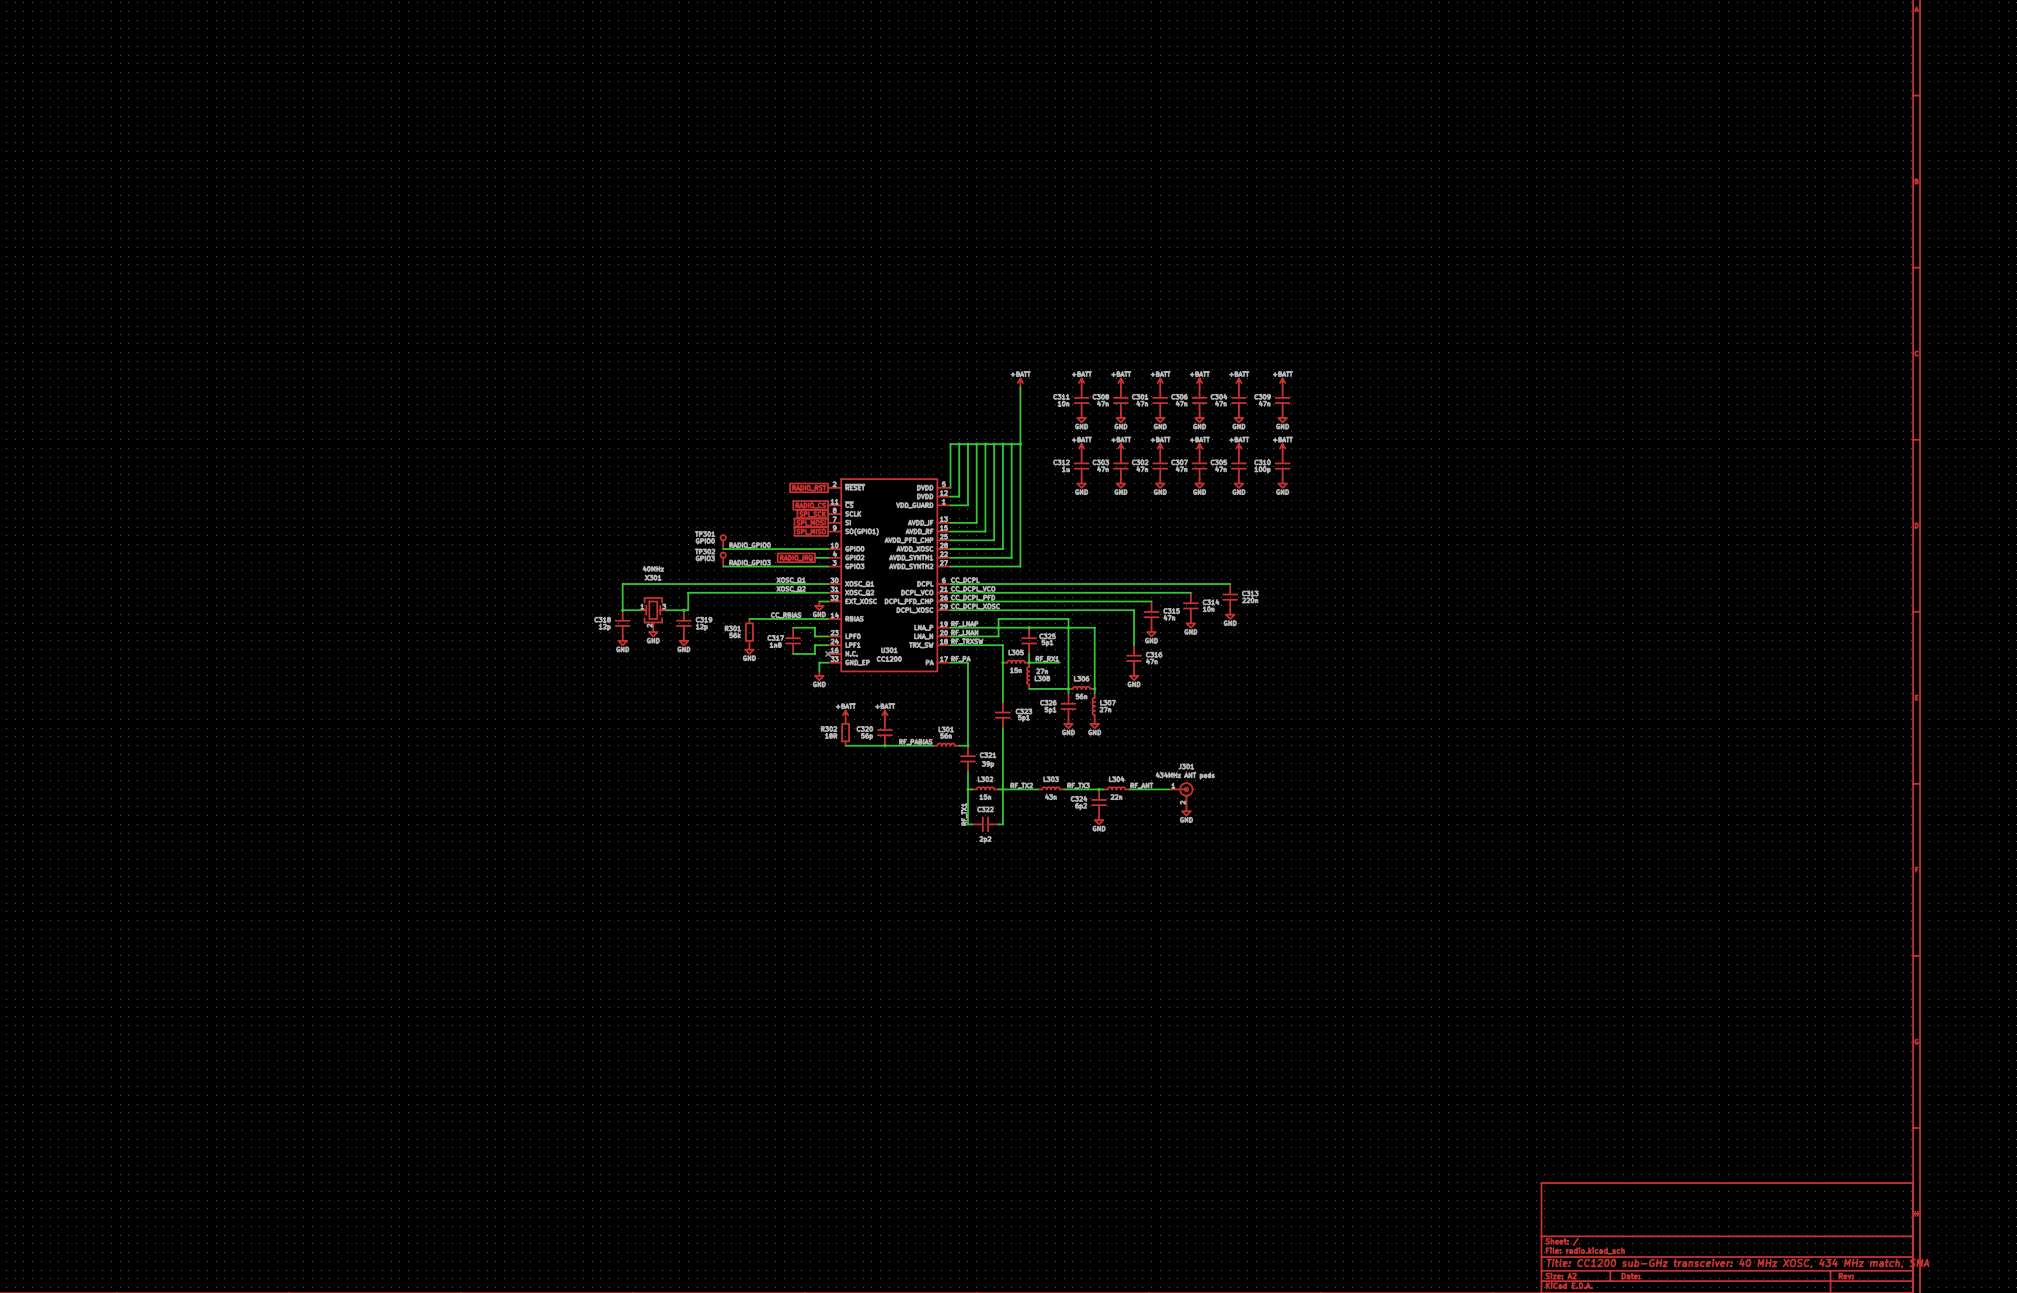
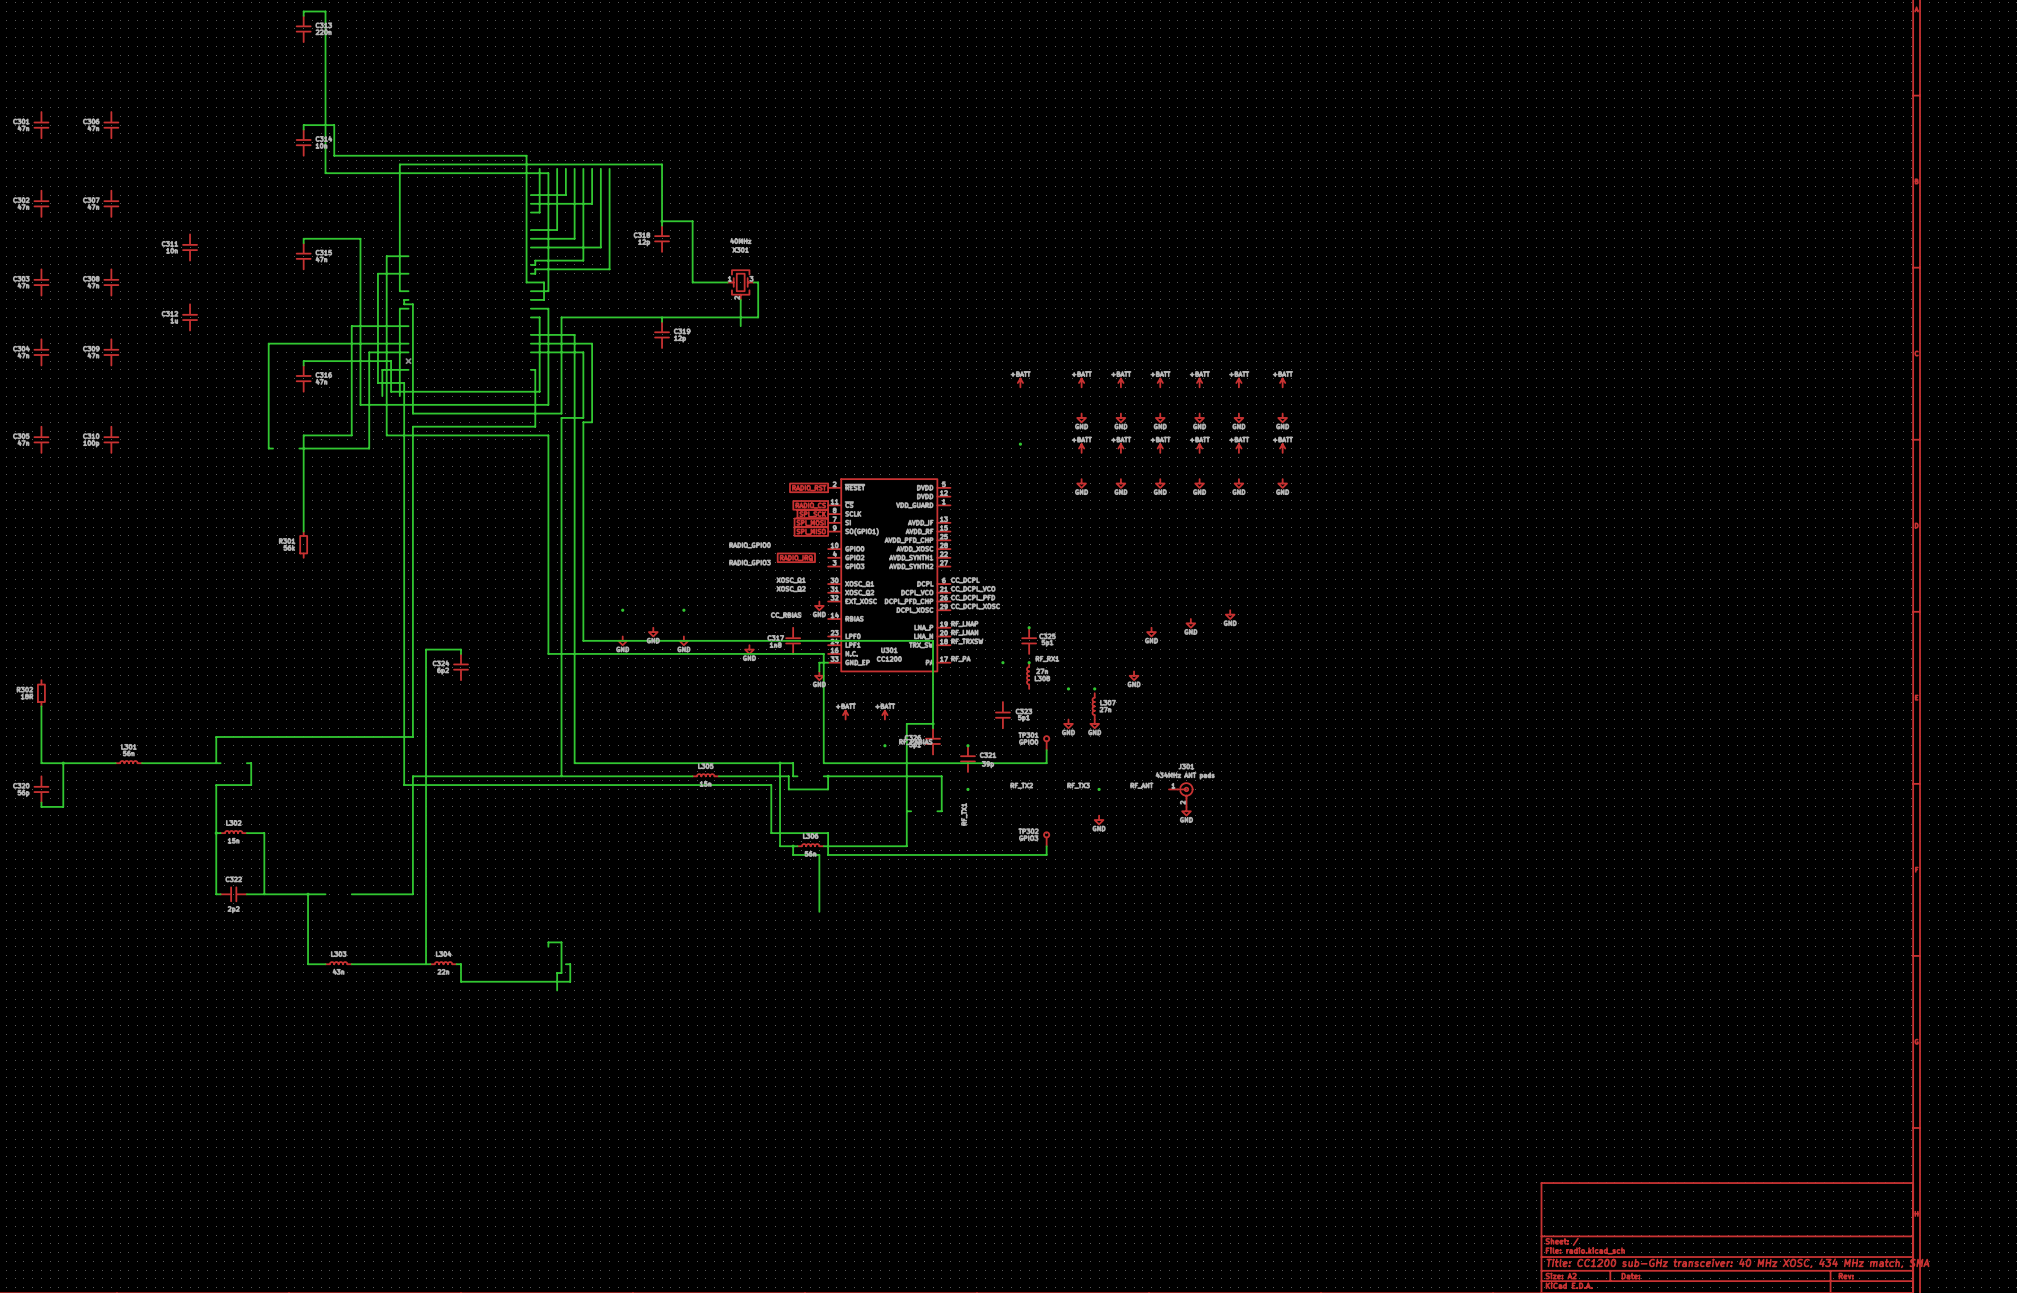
wire: none -> (303, 15) (303, 11) (325, 11) (325, 173) (548, 173) (548, 291) (530, 291)
wire: none -> (303, 129) (303, 125) (334, 125) (334, 155) (526, 155) (526, 282) (544, 282) (544, 299) (530, 299)
wire: none -> (539, 168) (539, 212) (530, 212)
wire: none -> (557, 168) (557, 230) (530, 230)
wire: none -> (565, 168) (565, 195) (530, 195)
wire: none -> (574, 168) (574, 238) (530, 238)
wire: none -> (583, 168) (583, 260) (535, 260) (535, 264) (530, 264)
wire: none -> (592, 168) (592, 203) (530, 203)
wire: none -> (600, 168) (600, 247) (530, 247)
wire: none -> (609, 168) (609, 269) (535, 269) (535, 273) (530, 273)
wire: none -> (662, 221) (692, 221) (692, 282) (727, 282)
wire: none -> (662, 225) (662, 164) (399, 164) (399, 291) (408, 291)
wire: none -> (303, 243) (303, 238) (360, 238) (360, 404) (548, 404) (548, 308) (530, 308)
wire: none -> (408, 256) (386, 256) (386, 435) (548, 435) (548, 653) (793, 653)
wire: none -> (408, 273) (377, 273) (377, 382) (404, 382) (404, 785) (771, 785) (771, 833) (828, 833) (828, 854) (1046, 854) (1046, 846)
wire: none -> (753, 282) (758, 282) (758, 317) (561, 317) (561, 413) (412, 413) (412, 304) (404, 304) (404, 299) (408, 299)
wire: none -> (740, 299) (740, 326)
wire: none -> (408, 308) (399, 308) (399, 396)
wire: none -> (530, 317) (539, 317) (539, 391) (391, 391) (391, 361) (303, 361) (303, 365)
wire: none -> (662, 317) (662, 321)
wire: none -> (408, 326) (351, 326) (351, 435) (303, 435) (303, 531)
wire: none -> (530, 334) (574, 334) (574, 763) (793, 763) (793, 776) (797, 776)
wire: none -> (408, 343) (268, 343) (268, 448) (273, 448)
wire: none -> (530, 343) (592, 343) (592, 422) (583, 422) (583, 640) (933, 640) (933, 728)
wire: none -> (408, 352) (369, 352) (369, 448) (299, 448)
wire: none -> (530, 352) (583, 352) (583, 417) (561, 417) (561, 776)
no-connect mark: none -> (408, 361)
wire: none -> (408, 369) (382, 369) (382, 396)
wire: none -> (530, 369) (535, 369) (535, 426) (412, 426) (412, 736) (216, 736) (216, 763)
wire: (1020, 387) (1020, 566) (950, 566) -> none
part position: (1081, 400) -> (190, 247)
part position: (1120, 400) -> (111, 282)
part position: (1160, 400) -> (41, 125)
part position: (1199, 400) -> (111, 125)
part position: (1238, 400) -> (41, 352)
part position: (1282, 400) -> (111, 352)
wire: (959, 444) (959, 496) (950, 496) -> none
wire: (967, 444) (967, 505) (950, 505) -> none
wire: (976, 444) (976, 522) (950, 522) -> none
wire: (985, 444) (985, 531) (950, 531) -> none
wire: (994, 444) (994, 540) (950, 540) -> none
wire: (1002, 444) (1002, 549) (950, 549) -> none
wire: (1011, 444) (1011, 557) (950, 557) -> none
wire: (1020, 444) (950, 444) (950, 487) -> none
part position: (1081, 466) -> (190, 317)
part position: (1120, 466) -> (41, 282)
part position: (1160, 466) -> (41, 203)
part position: (1199, 466) -> (111, 203)
part position: (1238, 466) -> (41, 439)
part position: (1282, 466) -> (111, 439)
part position: (723, 542) -> (1046, 743)
wire: (723, 549) (828, 549) -> none
wire: (815, 557) (828, 557) -> none
part position: (723, 559) -> (1046, 839)
wire: (723, 566) (828, 566) -> none
wire: (828, 584) (622, 584) (622, 610) (640, 610) -> none
wire: (950, 584) (1230, 584) -> none
wire: (828, 592) (688, 592) (688, 610) (666, 610) -> none
wire: (950, 592) (1190, 592) -> none
part position: (1230, 597) -> (303, 28)
wire: (819, 601) (828, 601) -> none
wire: (950, 601) (1151, 601) -> none
part position: (1190, 605) -> (303, 142)
wire: (950, 610) (1134, 610) (1134, 645) -> none
part position: (653, 612) -> (740, 285)
part position: (1151, 614) -> (303, 256)
wire: (749, 618) (828, 618) -> none
part position: (622, 623) -> (662, 238)
part position: (683, 623) -> (662, 334)
wire: (793, 627) (815, 627) (815, 636) (828, 636) -> none
wire: (950, 627) (1094, 627) (1094, 693) -> none
part position: (749, 632) -> (303, 544)
wire: (950, 636) (998, 636) (998, 618) (1068, 618) (1068, 693) -> none
wire: (828, 645) (815, 645) (815, 653) -> (1046, 750) (1046, 763) (823, 763) (823, 653) (815, 653)
wire: (950, 645) (1002, 645) (1002, 702) -> none
wire: none -> (460, 653) (460, 649) (426, 649) (426, 964)
no-connect mark: (828, 653) -> none
wire: (1029, 653) (1029, 662) (1059, 662) -> none
part position: (1134, 658) -> (303, 378)
part position: (1016, 661) -> (705, 775)
wire: (950, 662) (967, 662) (967, 745) (959, 745) -> none
part position: (1081, 687) -> (810, 845)
wire: (1029, 688) (1068, 688) -> none
wire: none -> (41, 706) (41, 763) (115, 763)
part position: (1068, 706) -> (933, 741)
wire: none -> (933, 723) (906, 723) (906, 846) (823, 846)
wire: (1002, 728) (1002, 824) (998, 824) -> none
part position: (845, 732) -> (41, 693)
part position: (884, 732) -> (41, 789)
part position: (946, 744) -> (128, 762)
wire: (845, 745) (933, 745) -> none
wire: none -> (63, 763) (63, 806) (41, 806) (41, 802)
wire: none -> (141, 763) (220, 763)
wire: none -> (246, 763) (251, 763) (251, 785) (216, 785) (216, 894) (220, 894)
wire: none -> (780, 763) (780, 846) (797, 846)
wire: (967, 771) (967, 824) (972, 824) -> none
wire: none -> (692, 776) (412, 776) (412, 894) (351, 894)
wire: none -> (718, 776) (788, 776) (788, 789) (828, 789) (828, 776)
wire: none -> (823, 776) (941, 776) (941, 811) (937, 811)
part position: (985, 788) -> (233, 832)
part position: (1051, 788) -> (338, 963)
part position: (1116, 788) -> (443, 963)
wire: (967, 789) (972, 789) -> (906, 811) (911, 811)
wire: (998, 789) (1037, 789) -> none
wire: (1064, 789) (1103, 789) -> none
wire: (1129, 789) (1169, 789) -> none
part position: (1099, 802) -> (460, 667)
part position: (985, 824) -> (233, 894)
wire: none -> (216, 833) (220, 833)
wire: none -> (246, 833) (264, 833) (264, 894)
wire: none -> (793, 846) (793, 854) (819, 854) (819, 911)
wire: none -> (246, 894) (325, 894)
wire: none -> (308, 894) (308, 964) (325, 964)
wire: none -> (548, 946) (548, 942) (561, 942) (561, 972) (557, 972) (557, 990)
wire: none -> (351, 964) (430, 964)
wire: none -> (456, 964) (460, 964) (460, 981) (570, 981) (570, 964) (565, 964)

